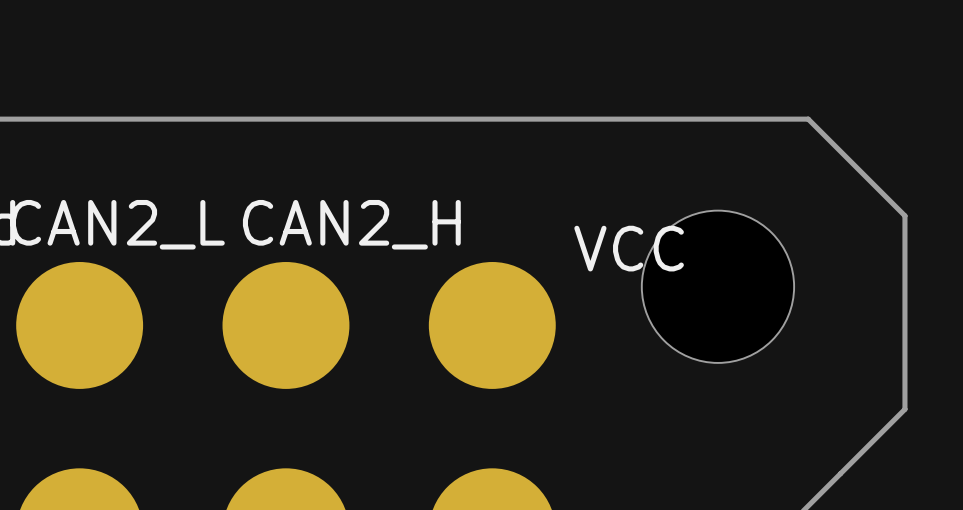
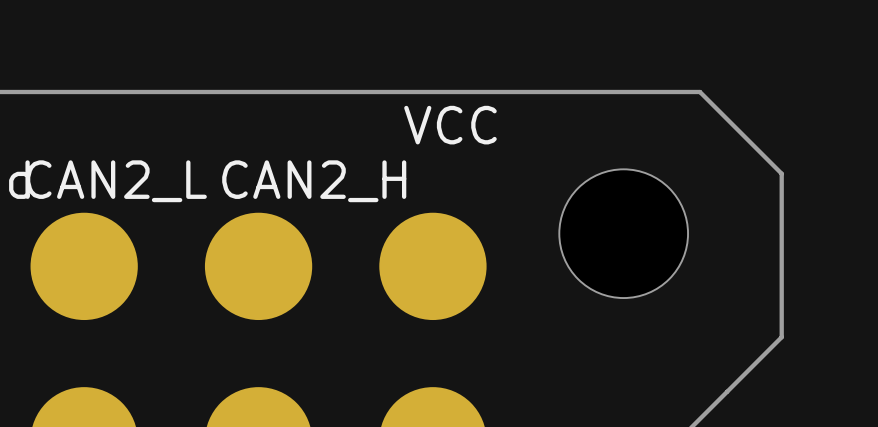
part text position: VCC (629, 248) -> VCC (450, 125)

